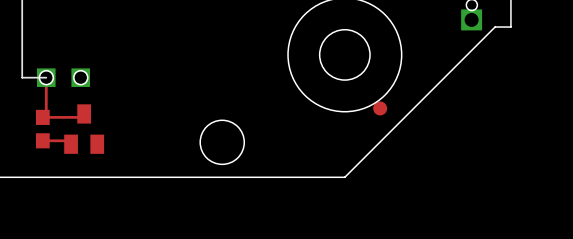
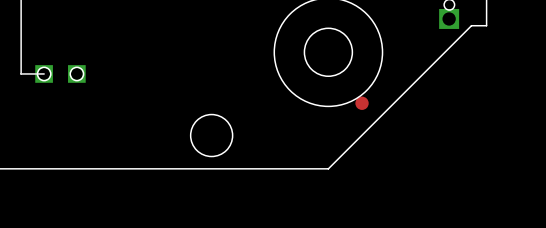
top track: (46, 77) (46, 113) (42, 117) (80, 117) (84, 113) -> none
part: (42, 129) -> none
part: (84, 129) -> none
top track: (42, 140) (67, 140) (71, 144) -> none

